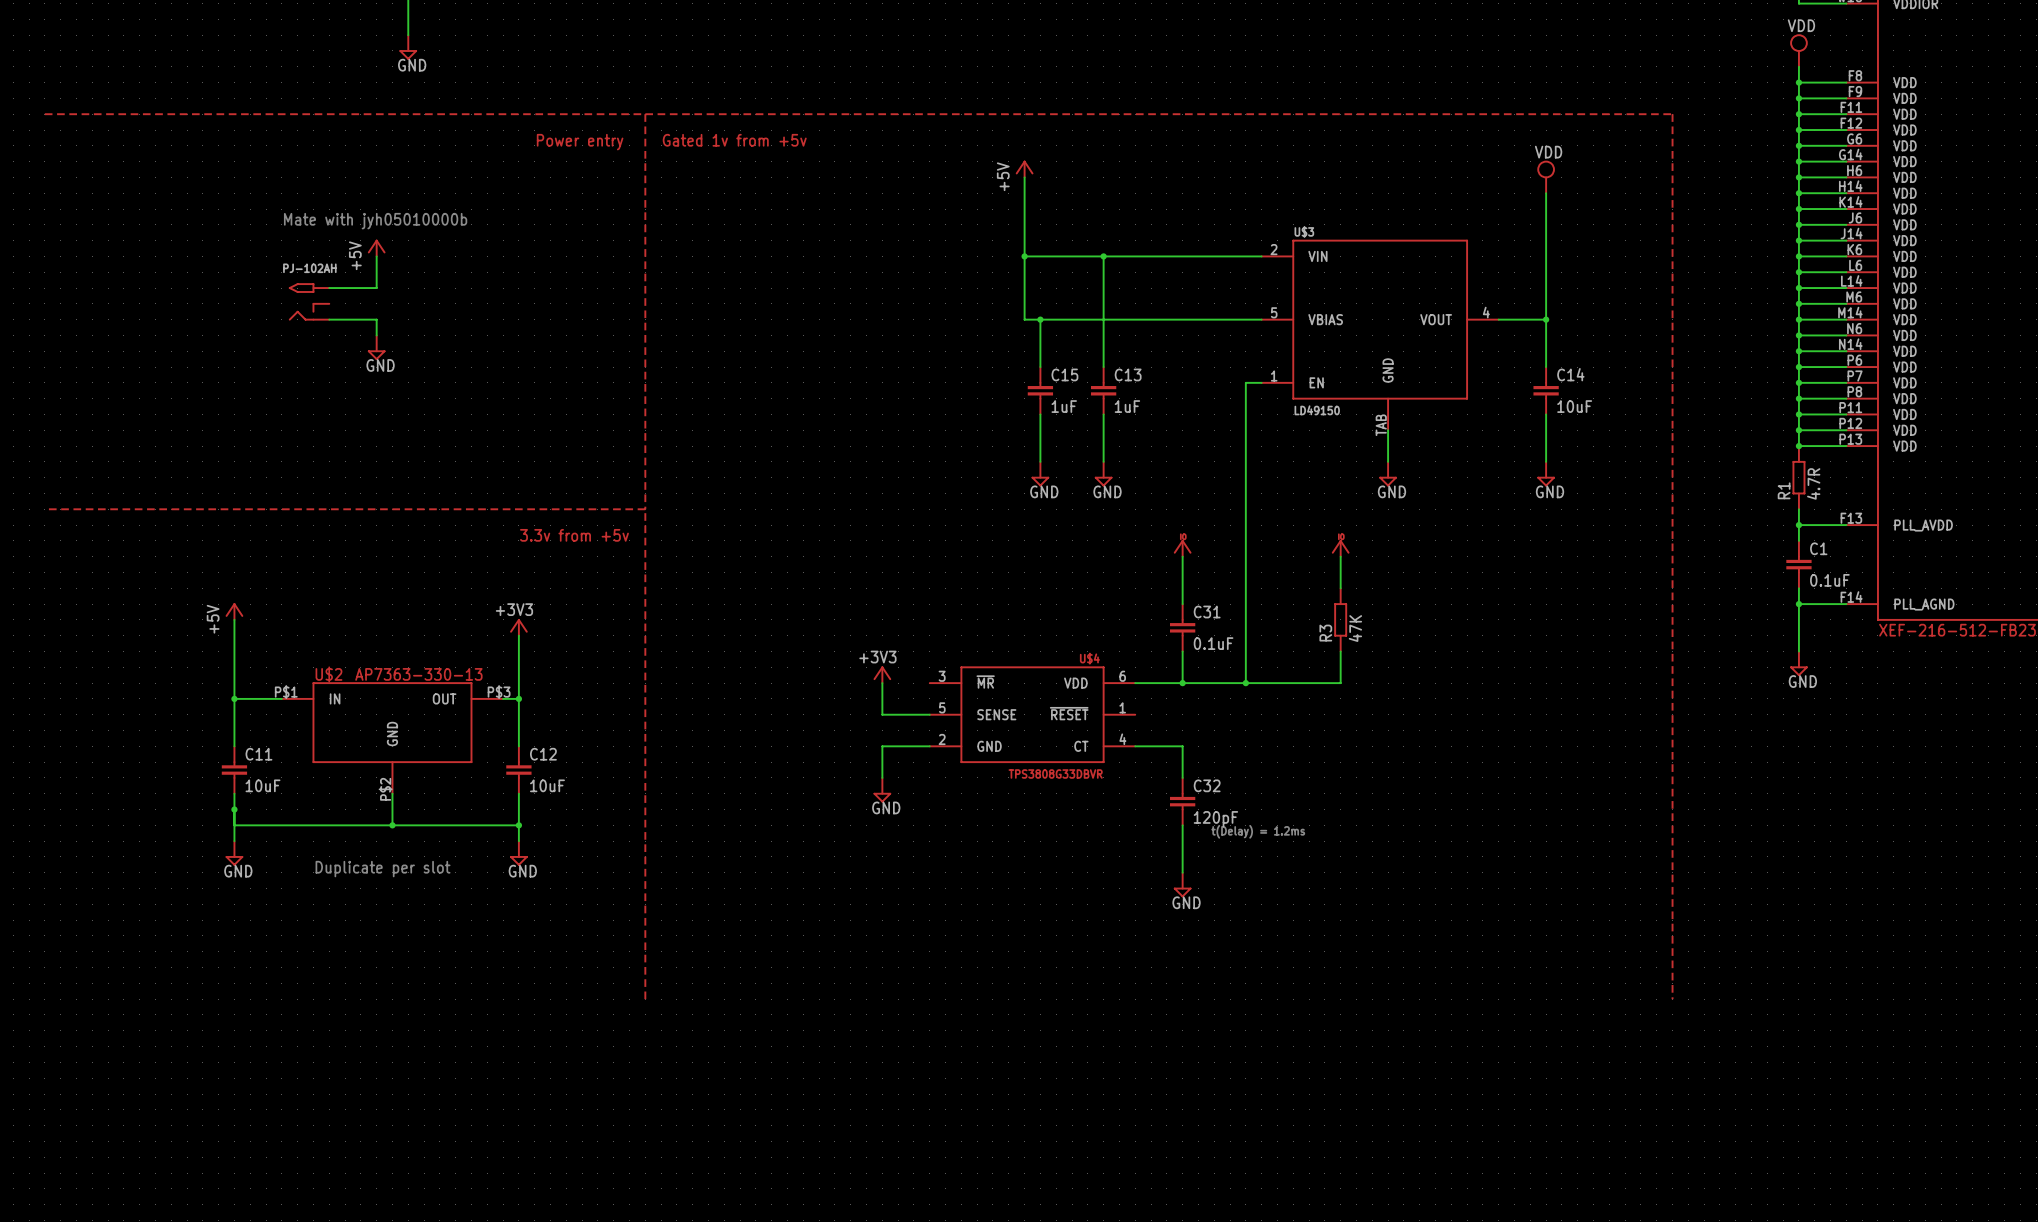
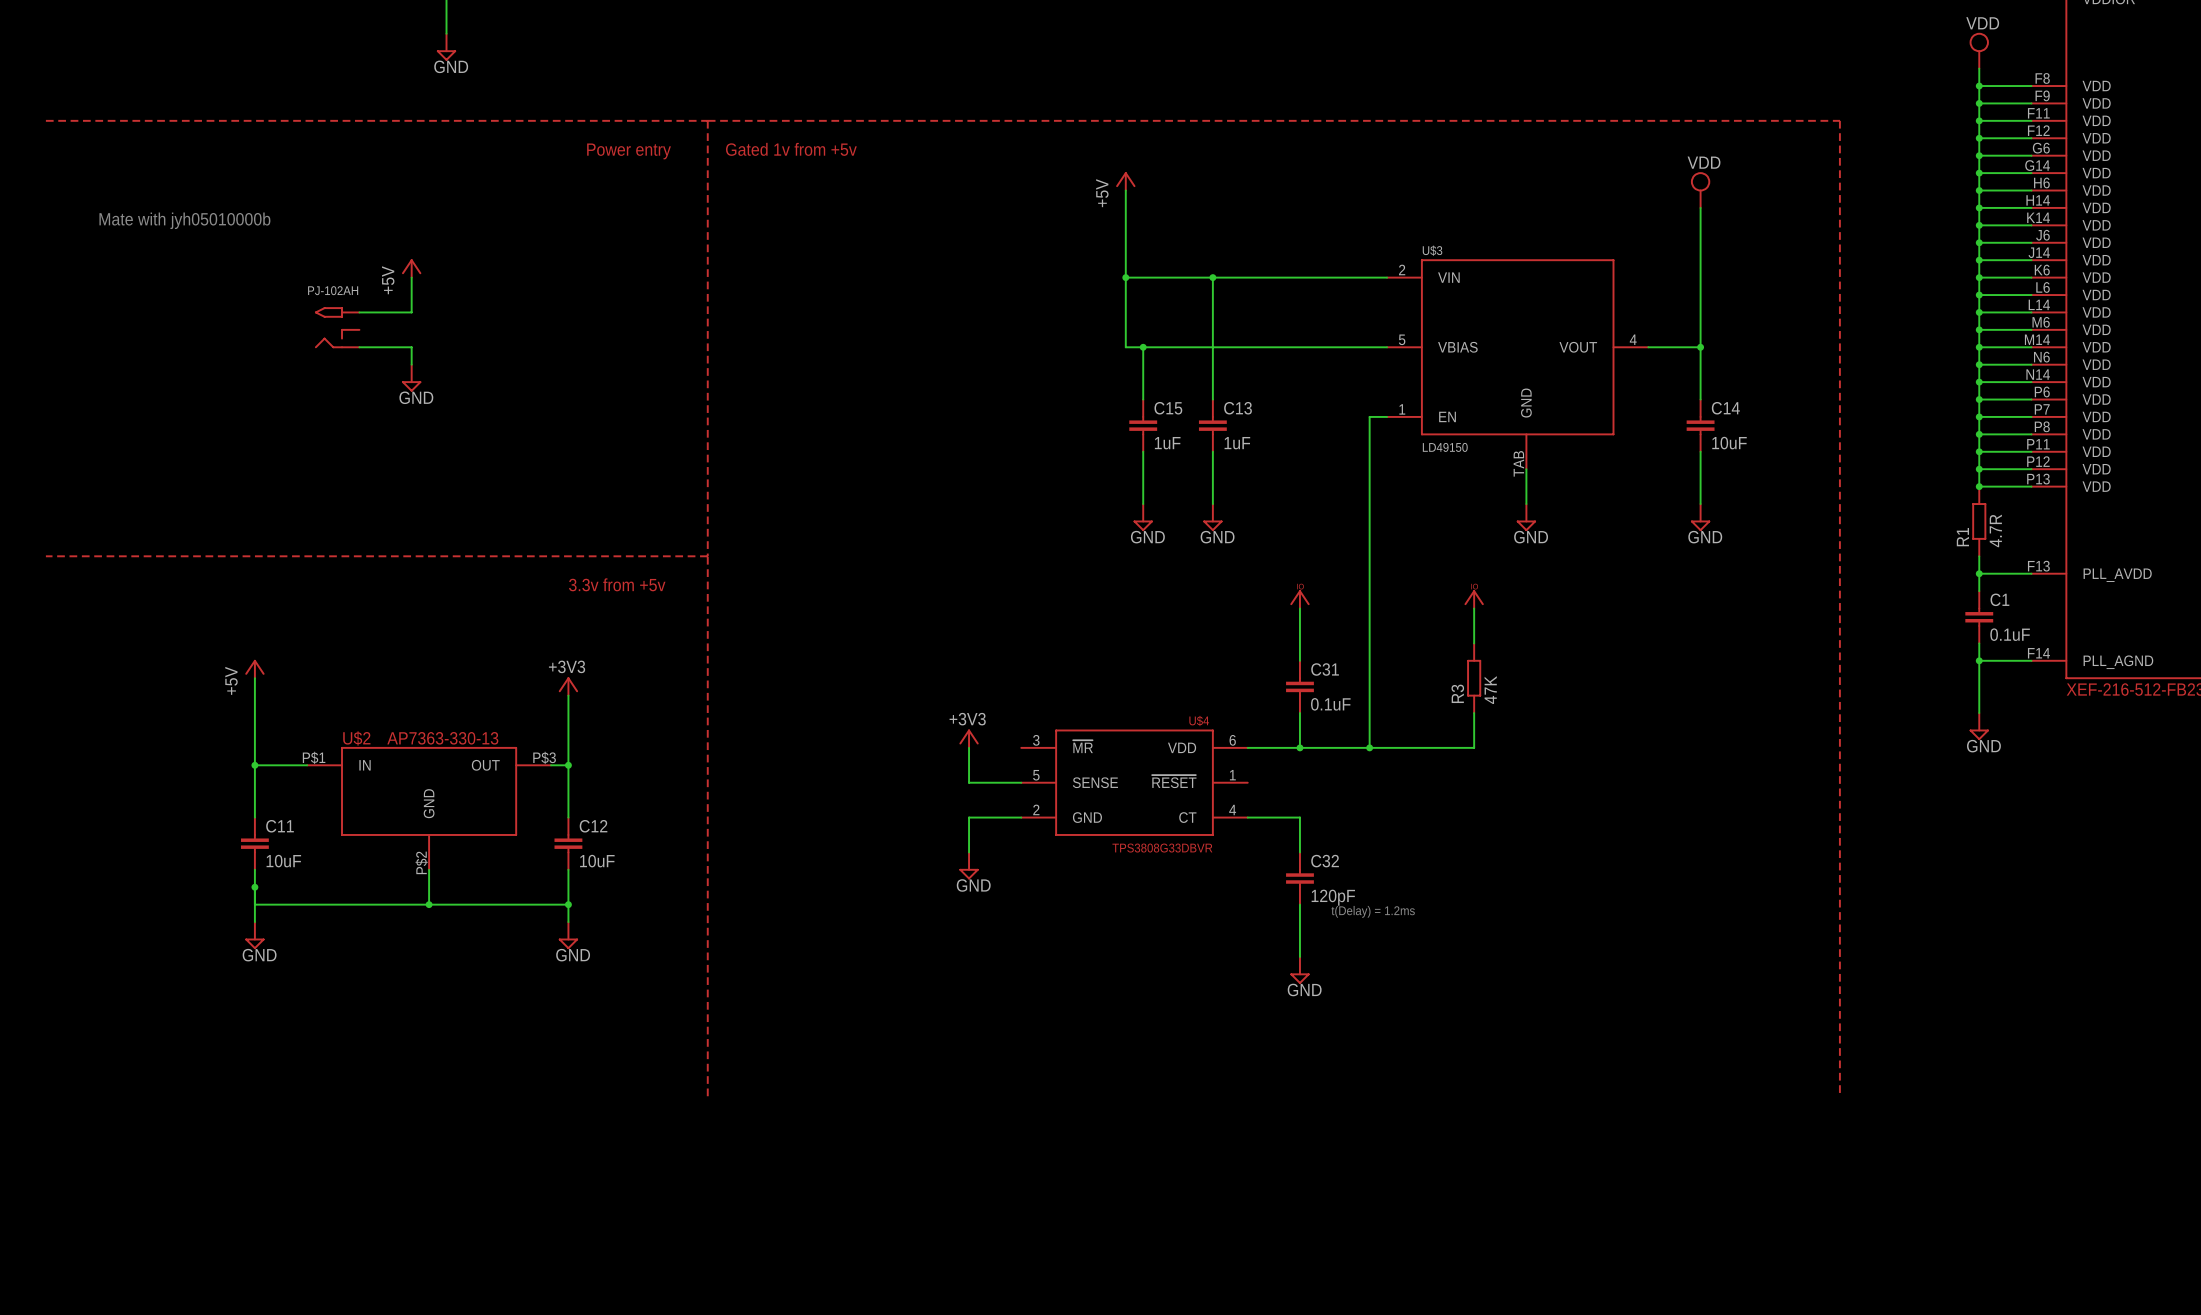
text: none -> Mate with jyh05010000b (184, 220)
text: Mate with jyh05010000b (375, 221) -> none
text: Duplicate per slot (383, 869) -> none

